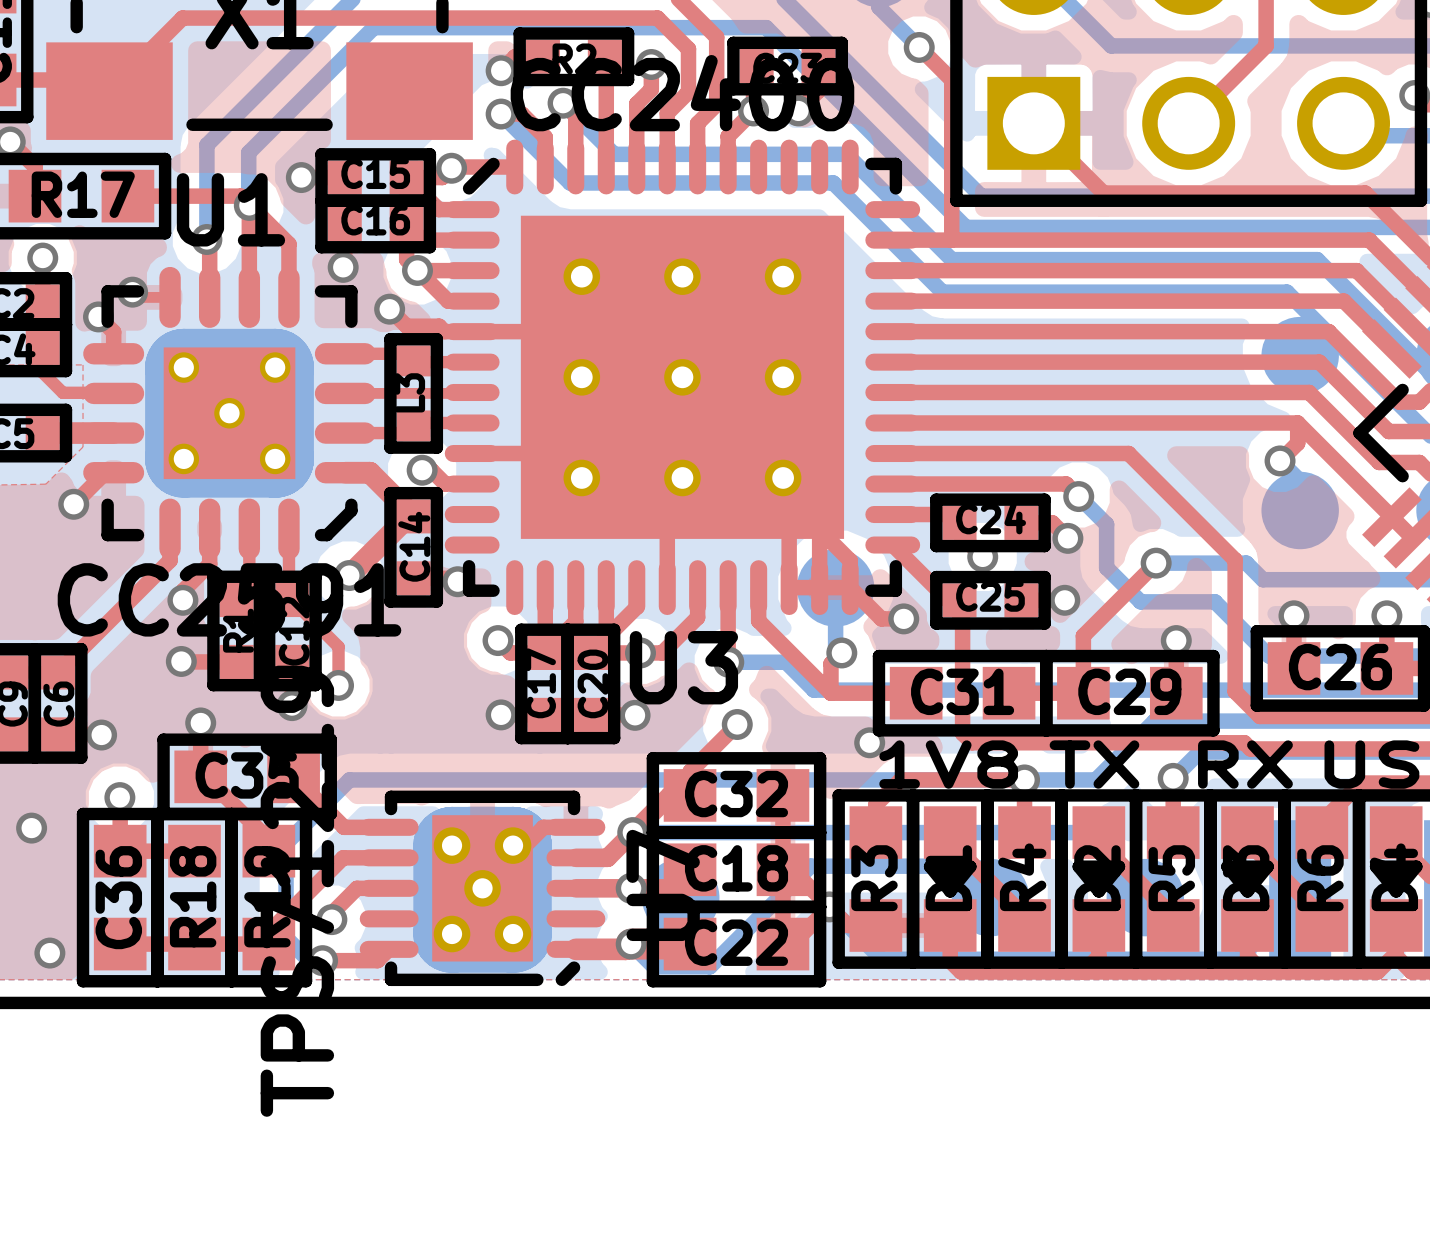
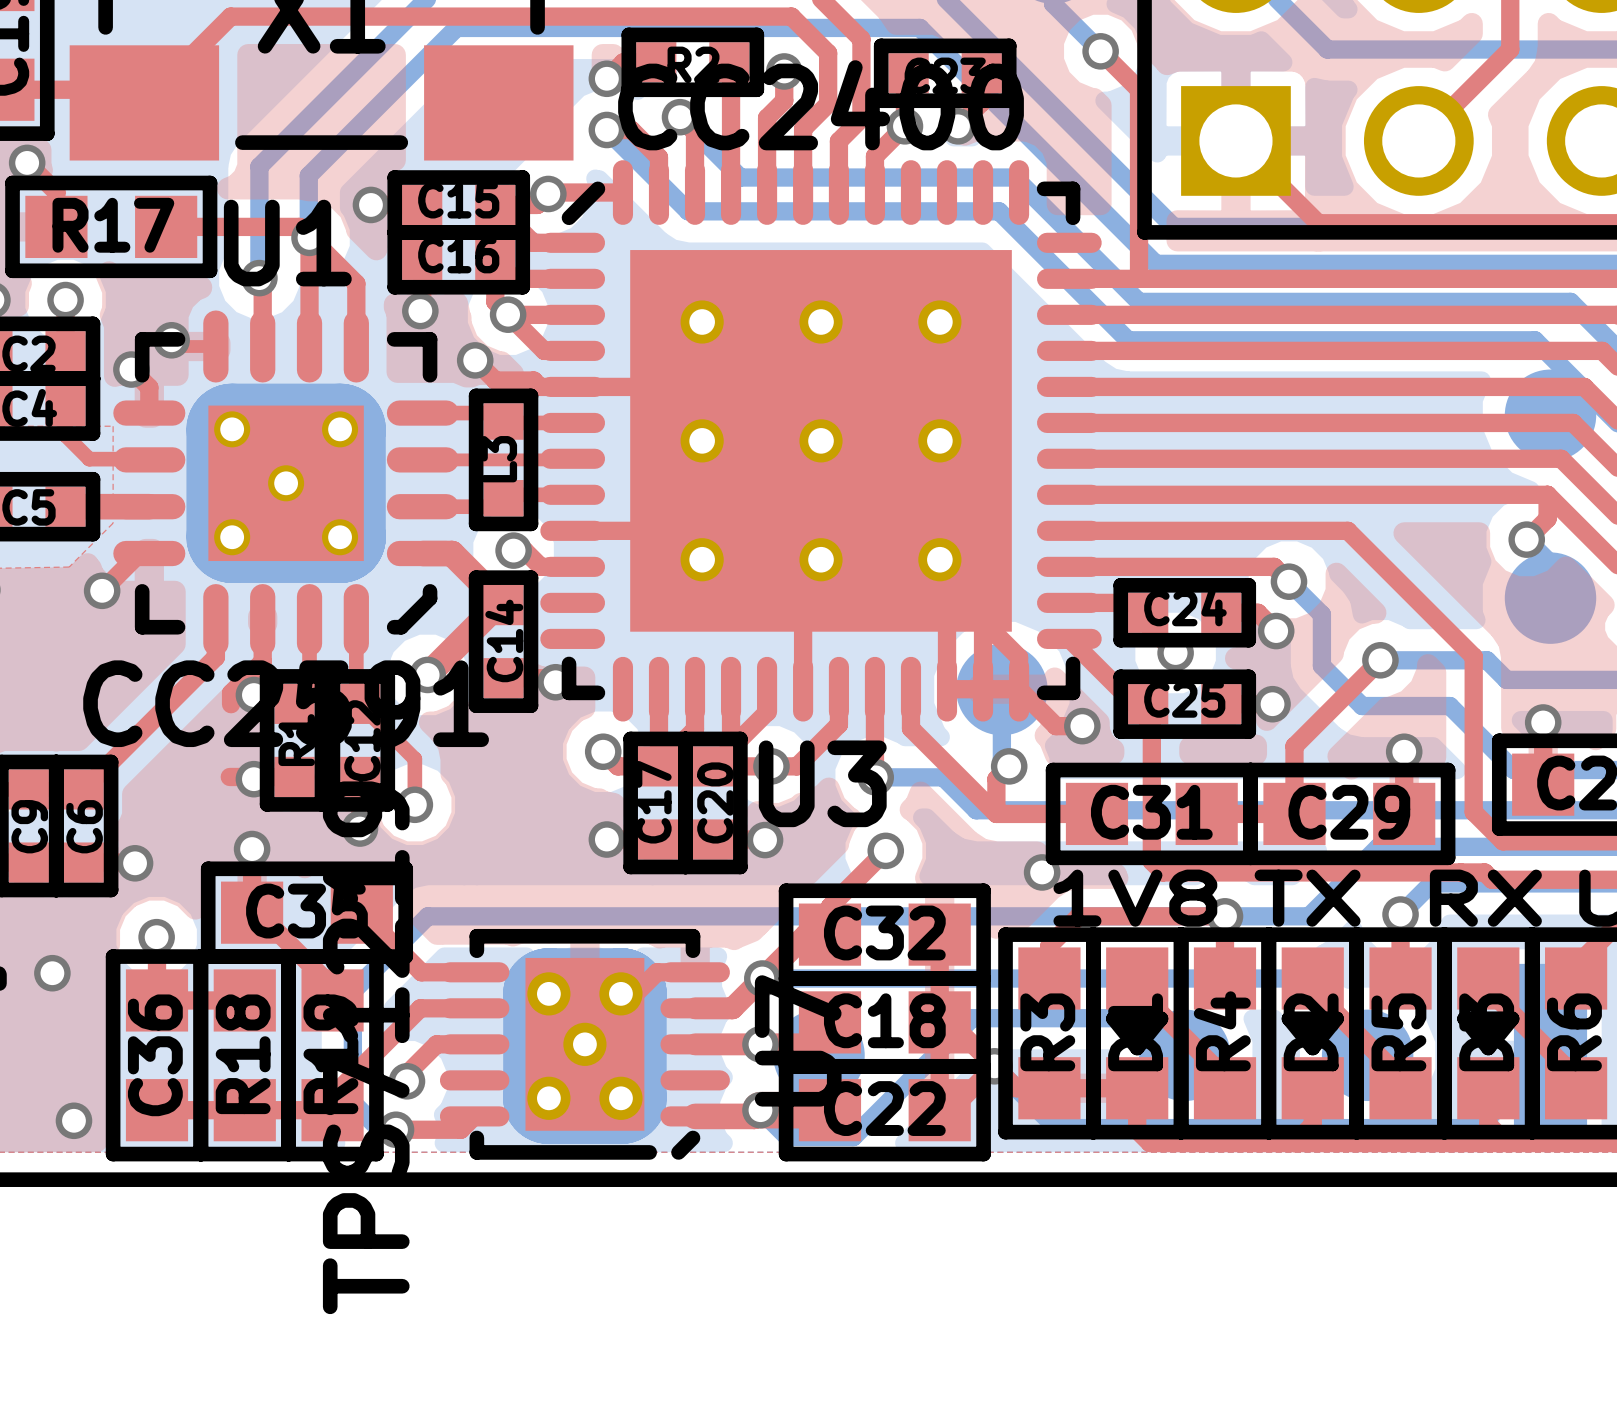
via position: (182, 600) -> (253, 695)
via position: (181, 661) -> (253, 779)

